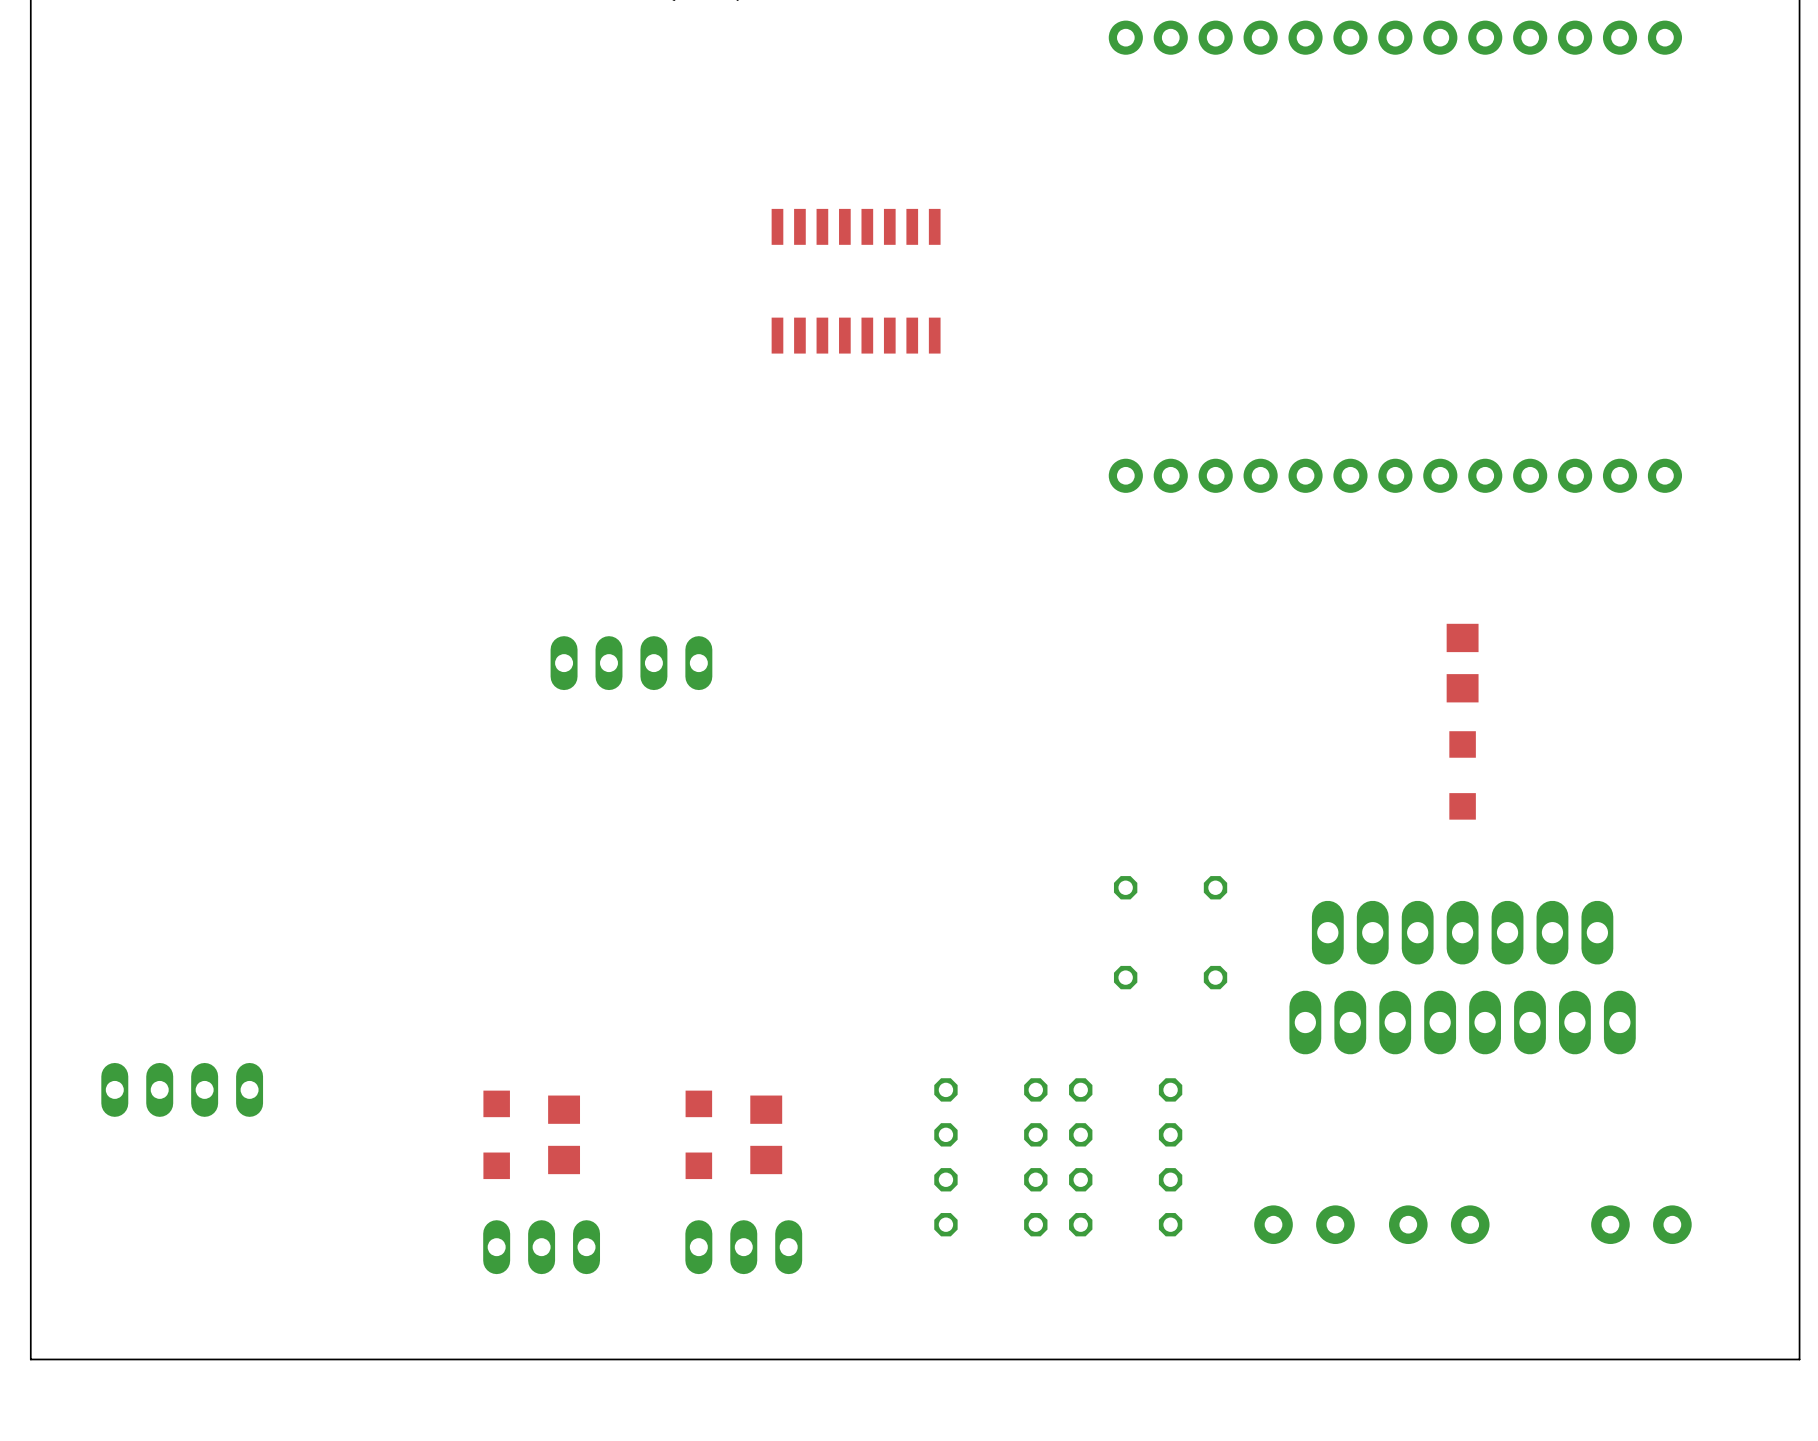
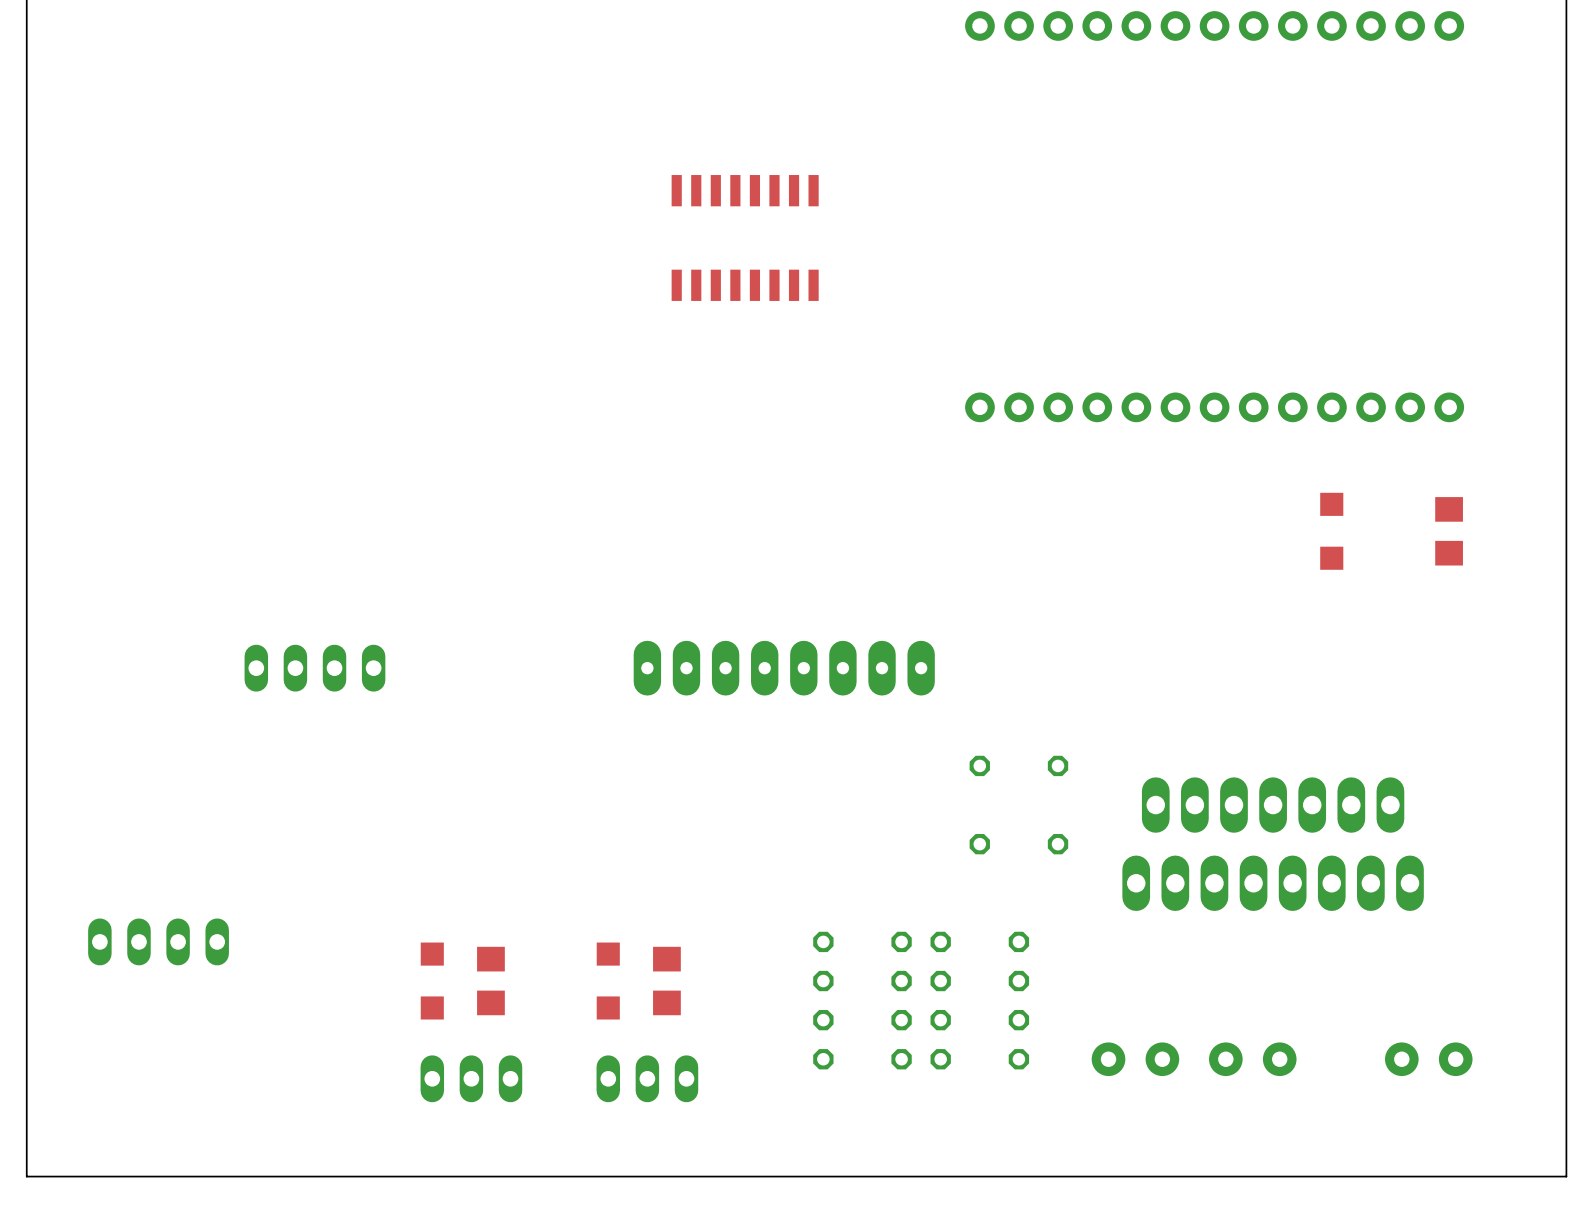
part position: (631, 663) -> (314, 668)
part position: (1462, 663) -> (1449, 531)
part: none -> (784, 668)
part position: (1462, 775) -> (1331, 531)

